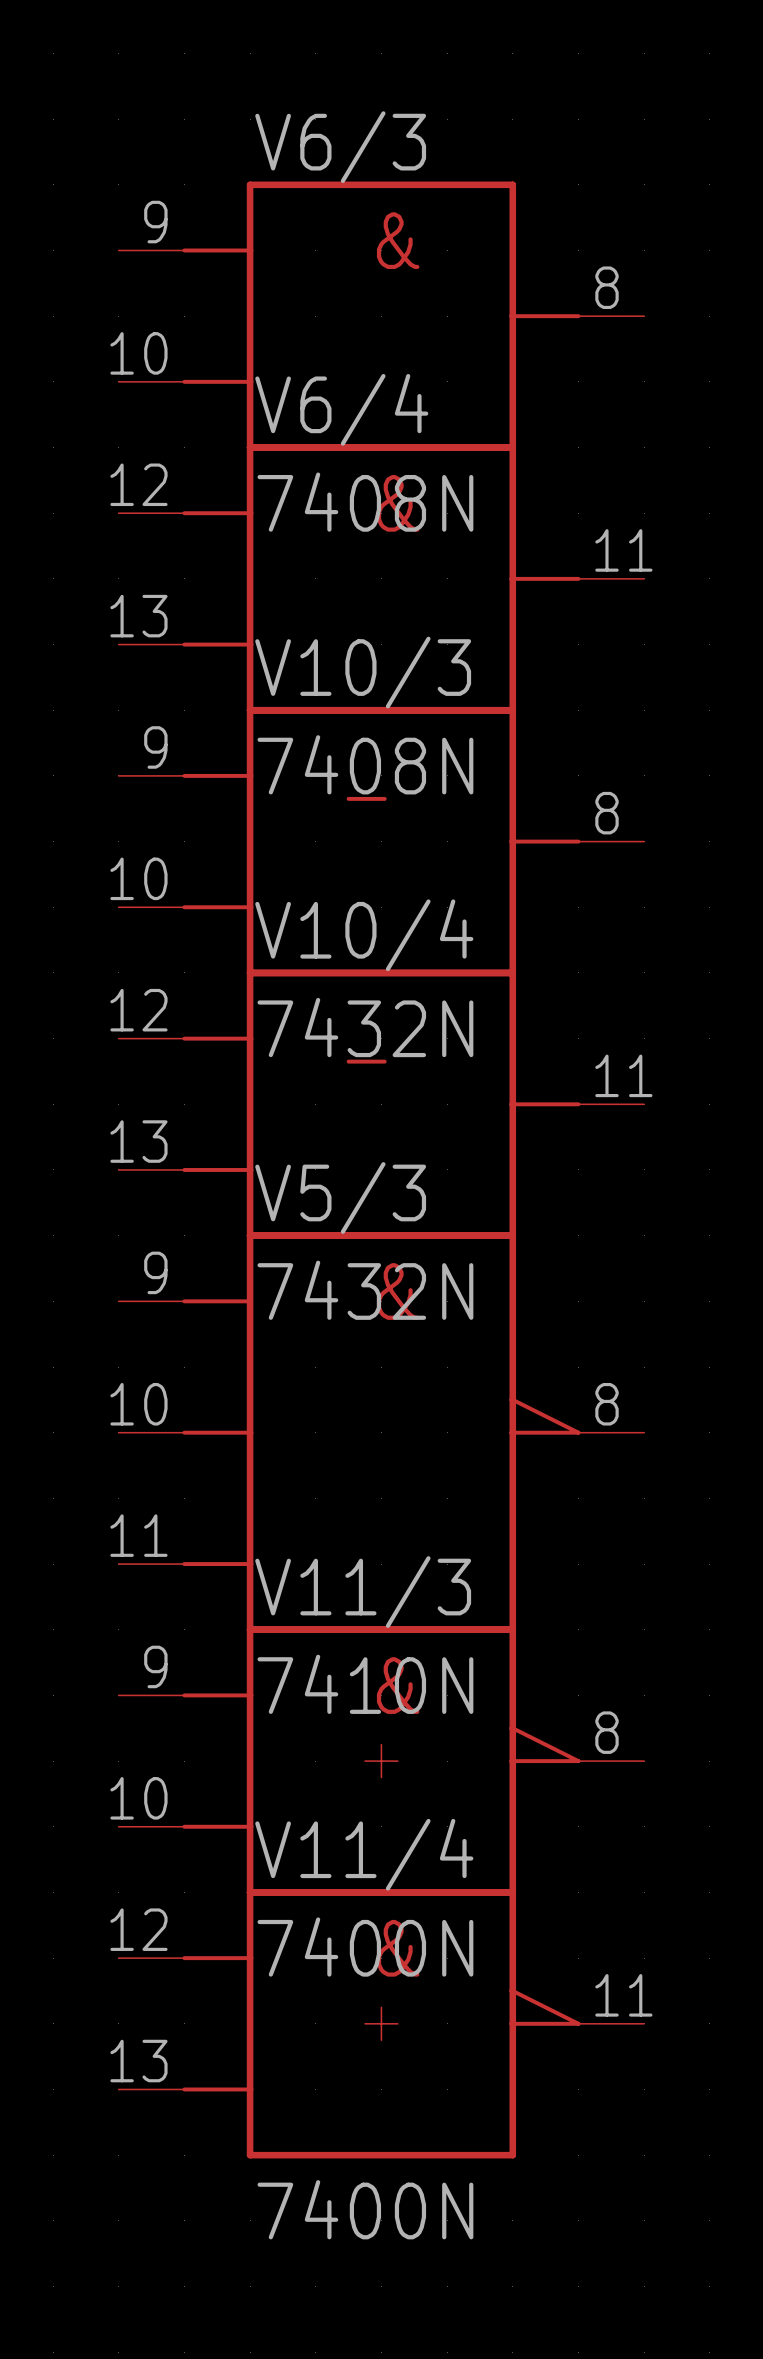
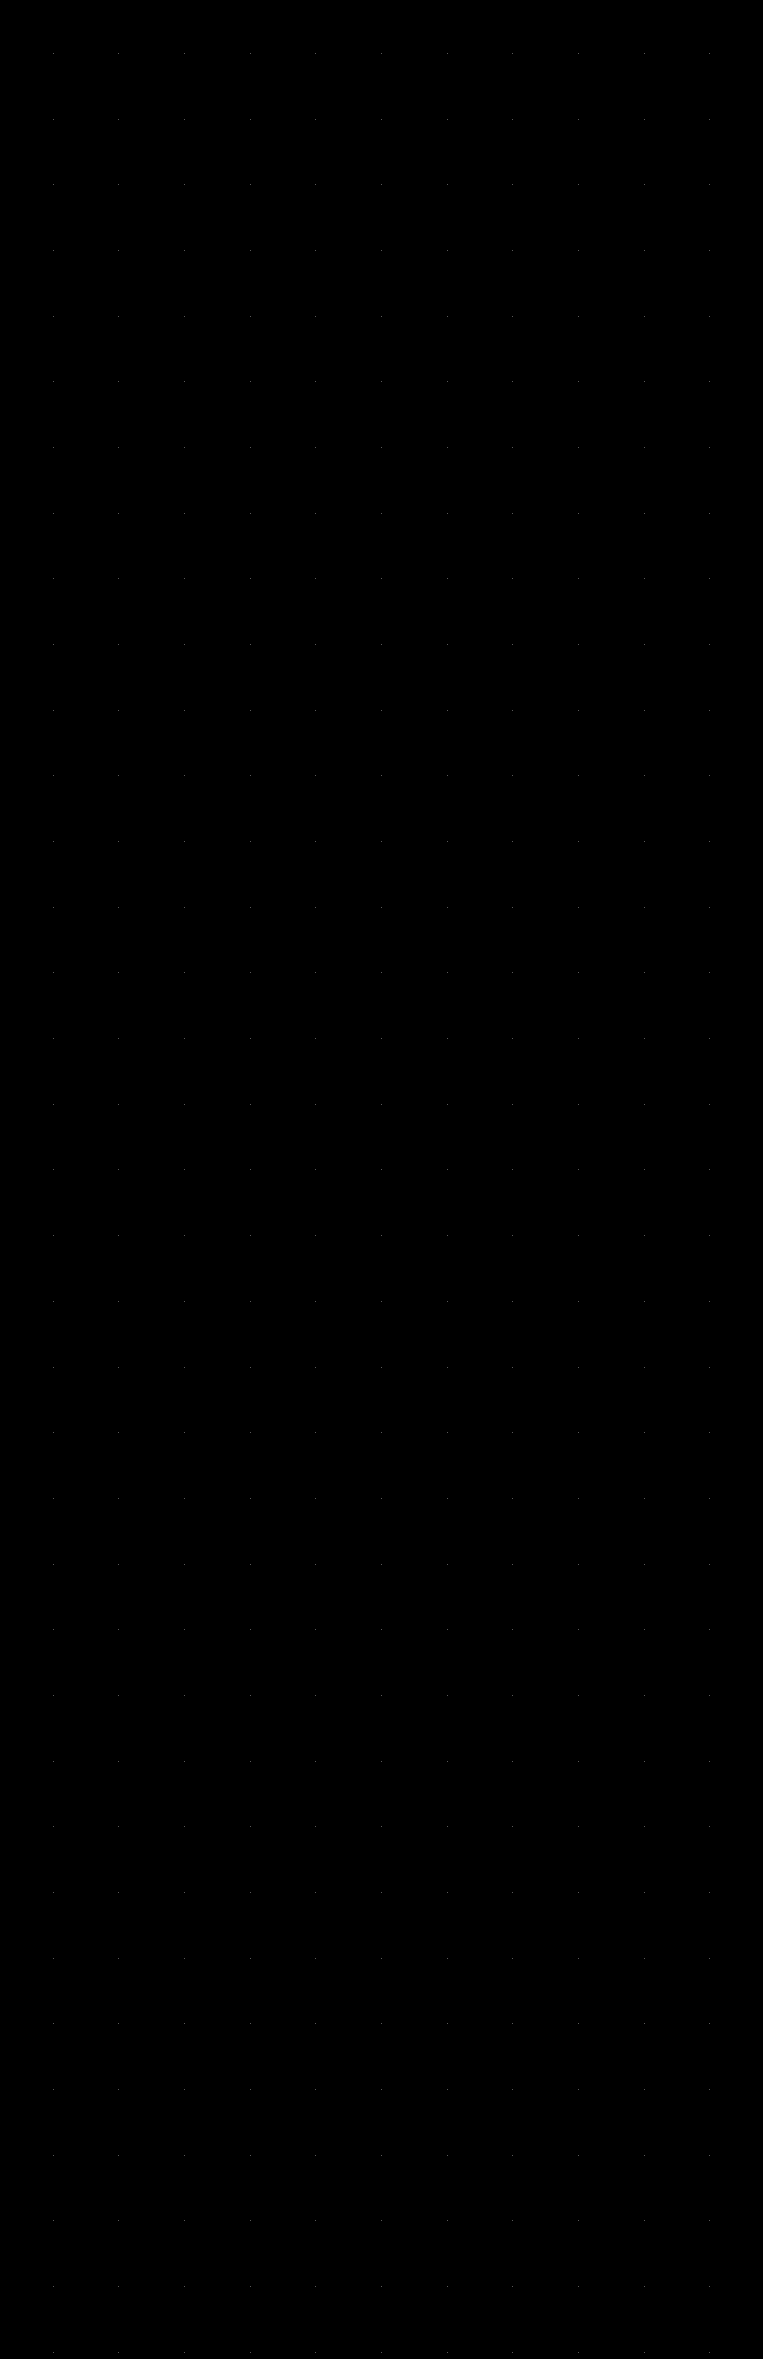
V6/3: 7408N (381, 316) -> none
V6/4: 7408N (381, 578) -> none
V10/3: 7432N (381, 841) -> none
V10/4: 7432N (381, 1104) -> none
V5/3: 7410N (381, 1432) -> none
V11/3: 7400N (381, 1761) -> none
V11/4: 7400N (381, 2023) -> none

